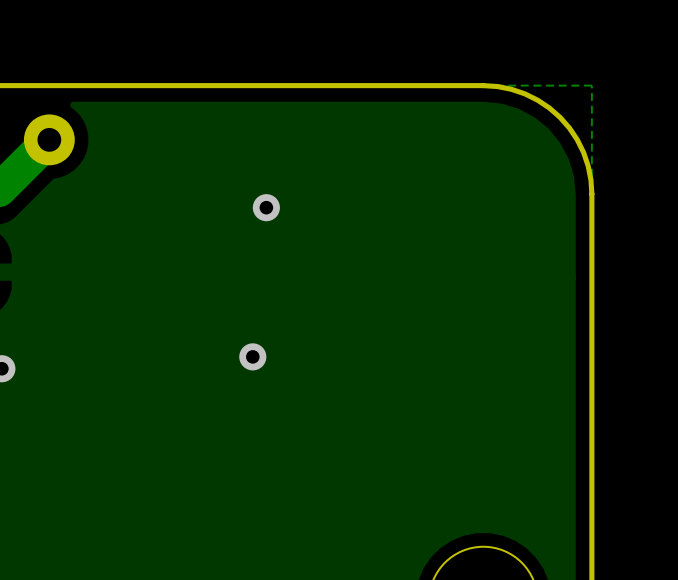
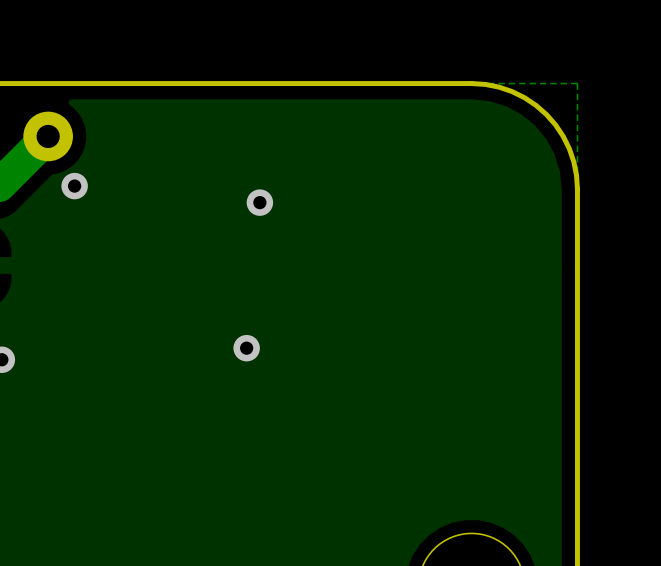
via: none -> (74, 186)

